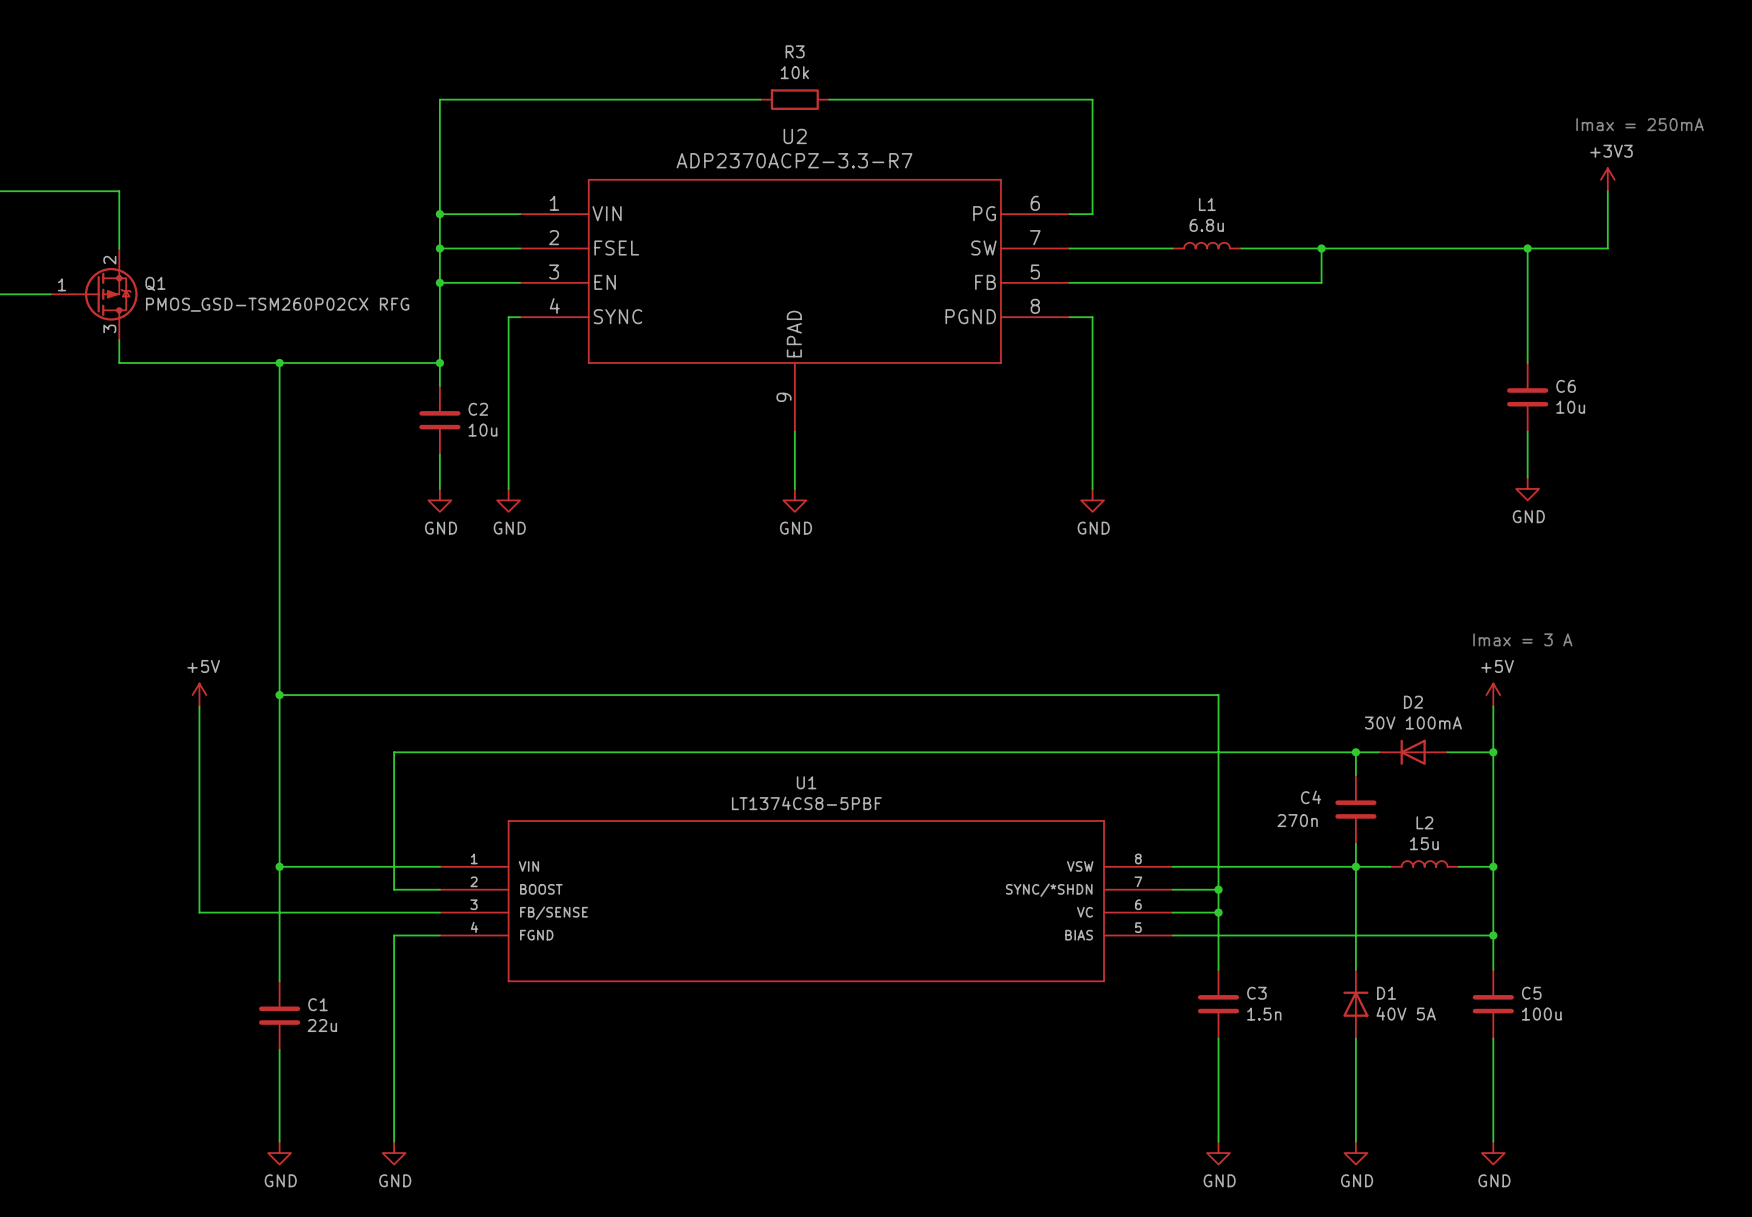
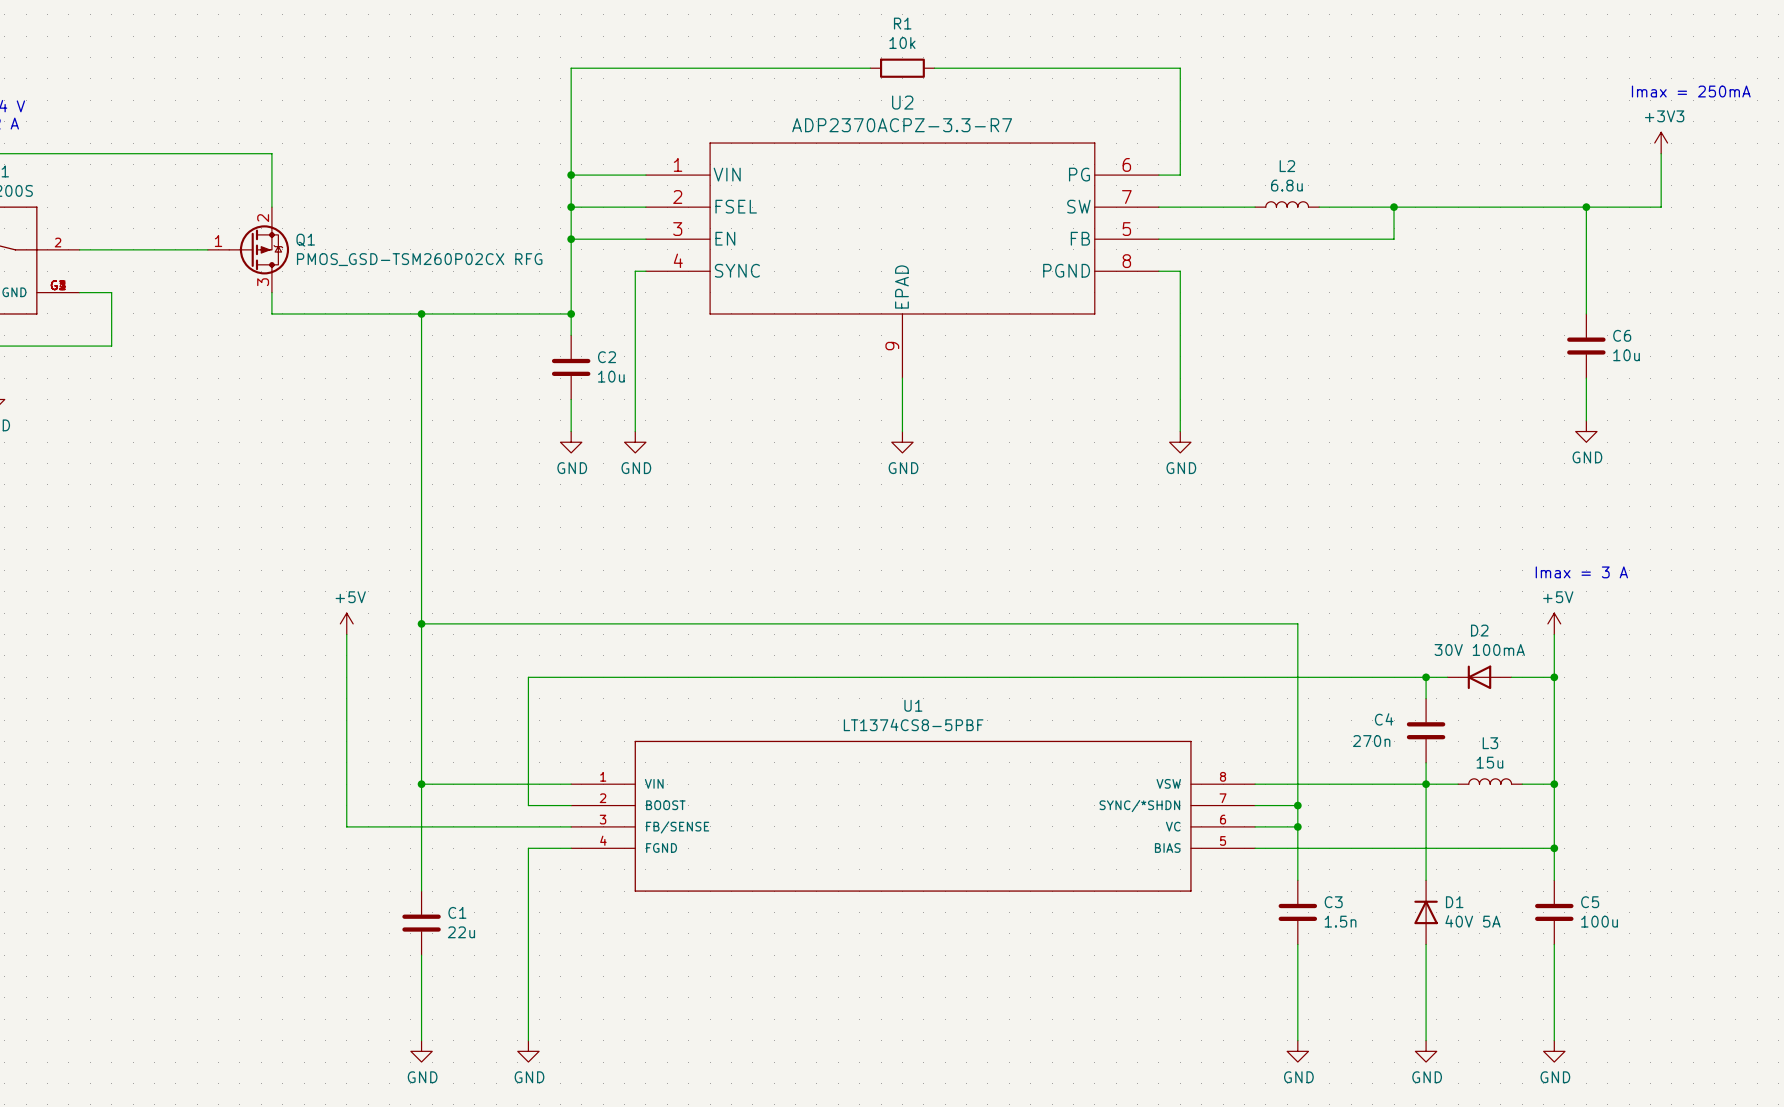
R3 name: R3 (795, 51) -> R1 (902, 23)
L1 name: L1 (1207, 204) -> L2 (1287, 166)
L2 name: L2 (1424, 822) -> L3 (1490, 743)

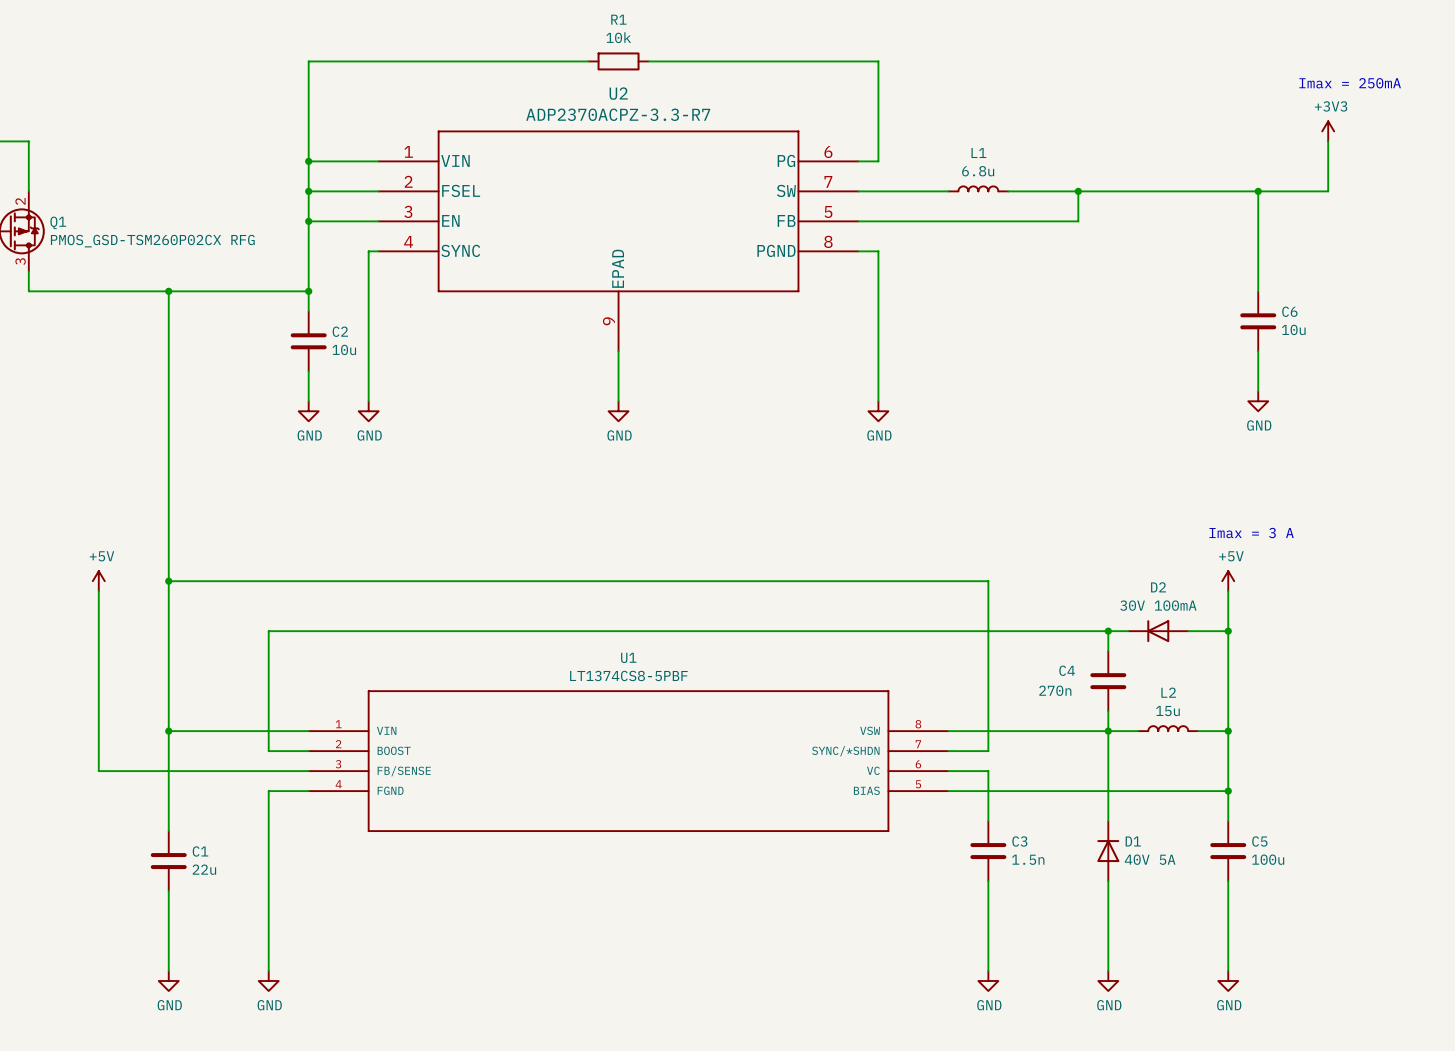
L2 name: L2 (1287, 166) -> L1 (978, 153)
L3 name: L3 (1490, 743) -> L2 (1168, 692)
wire: (1297, 805) (1297, 826) -> none
junction: (1297, 805) -> none
junction: (1297, 826) -> none

